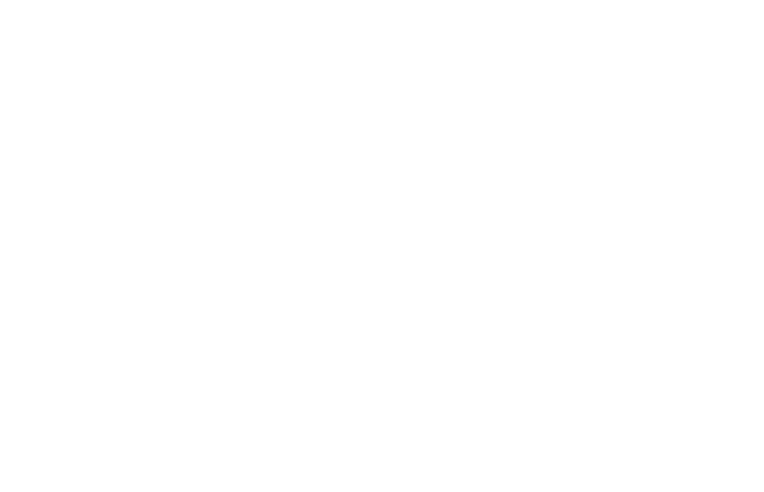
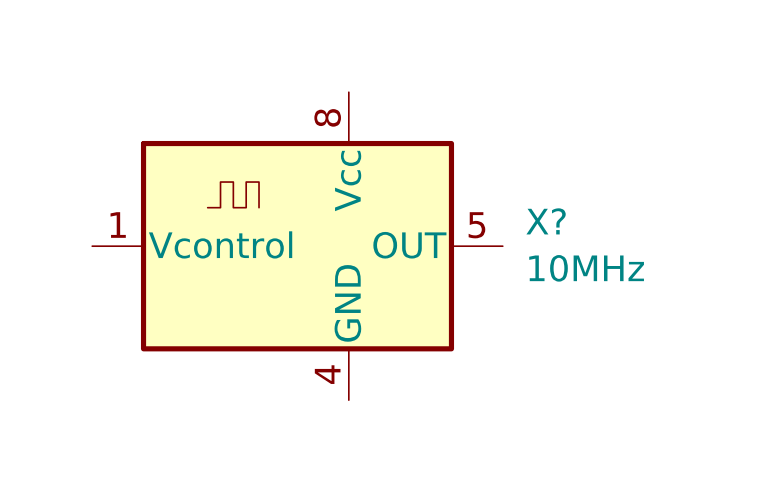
X?: none -> 10MHz (297, 246)

